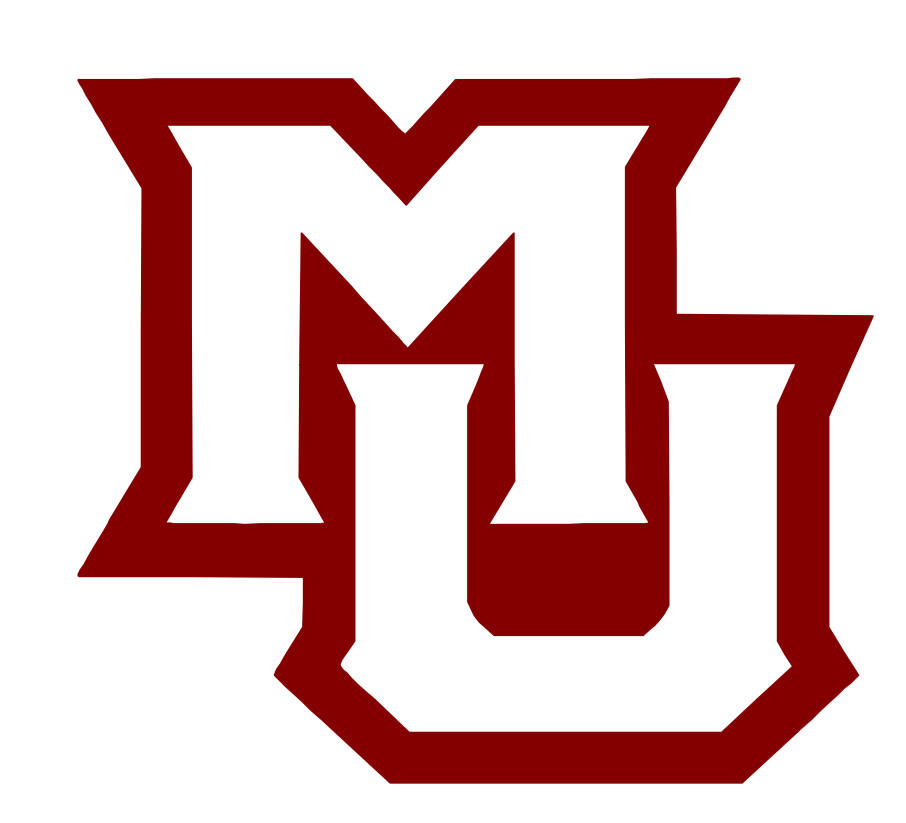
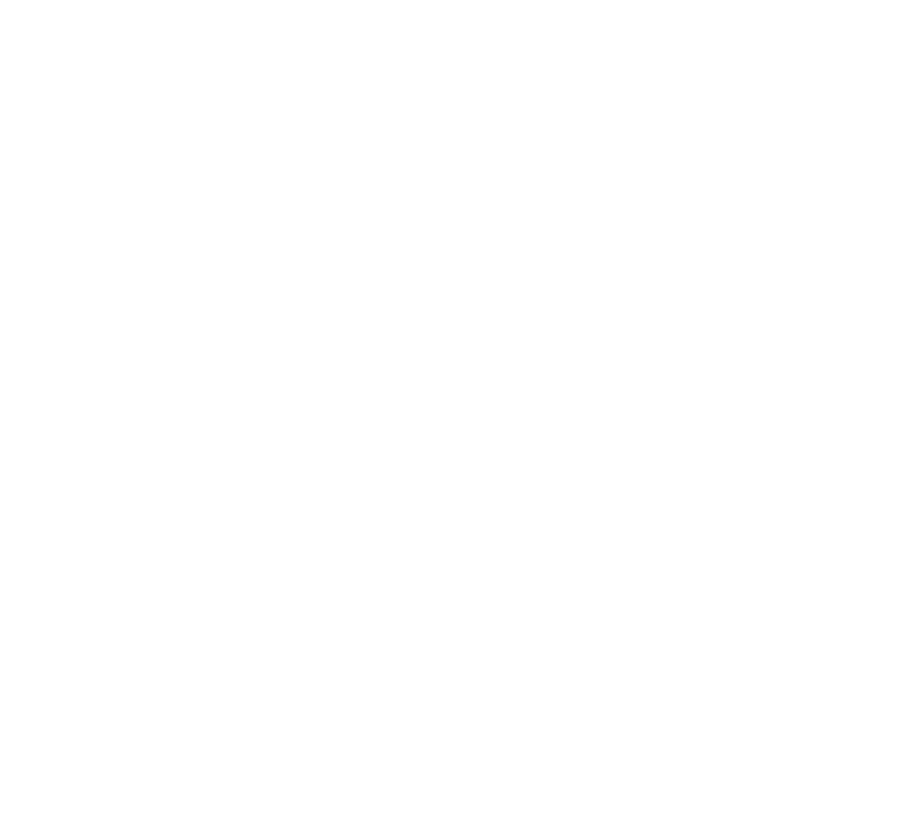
power symbol: (475, 430) -> none

